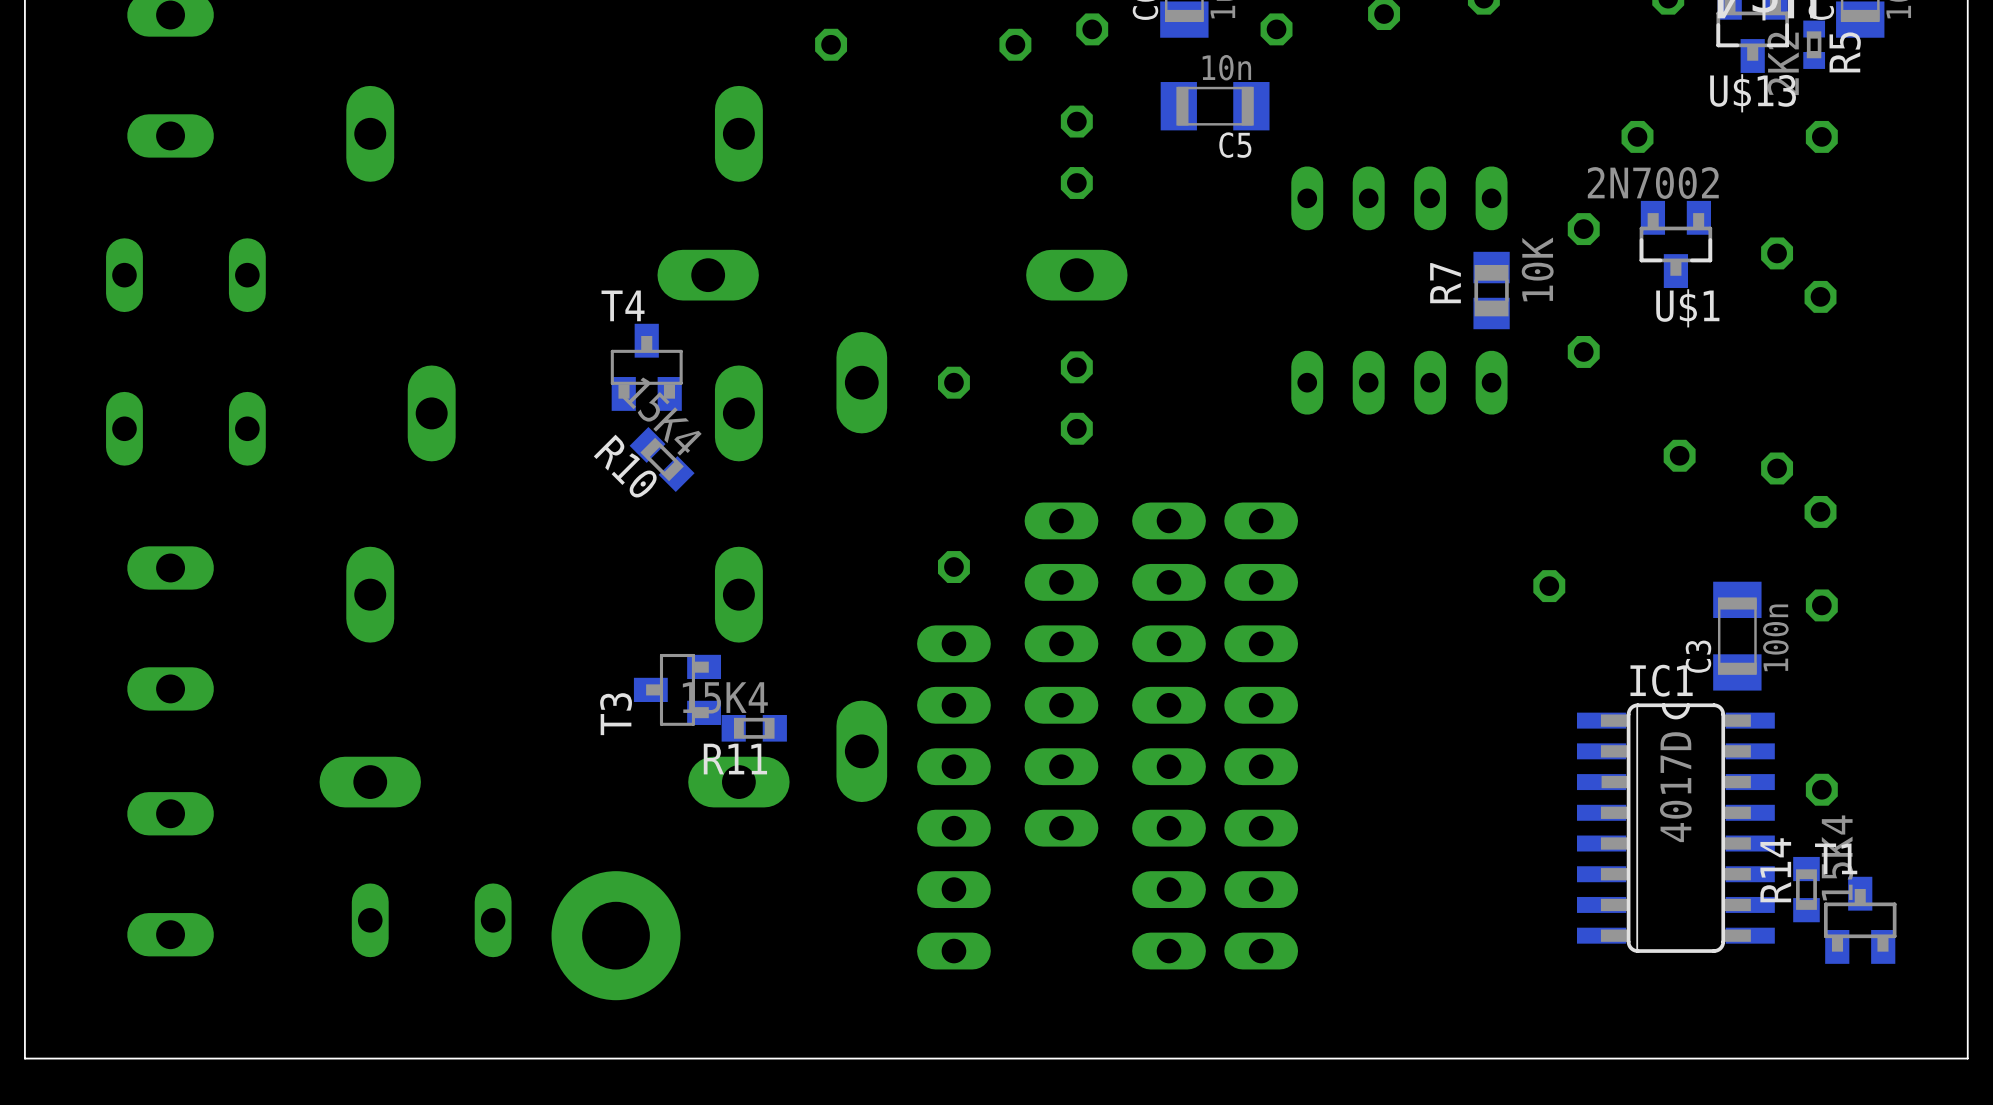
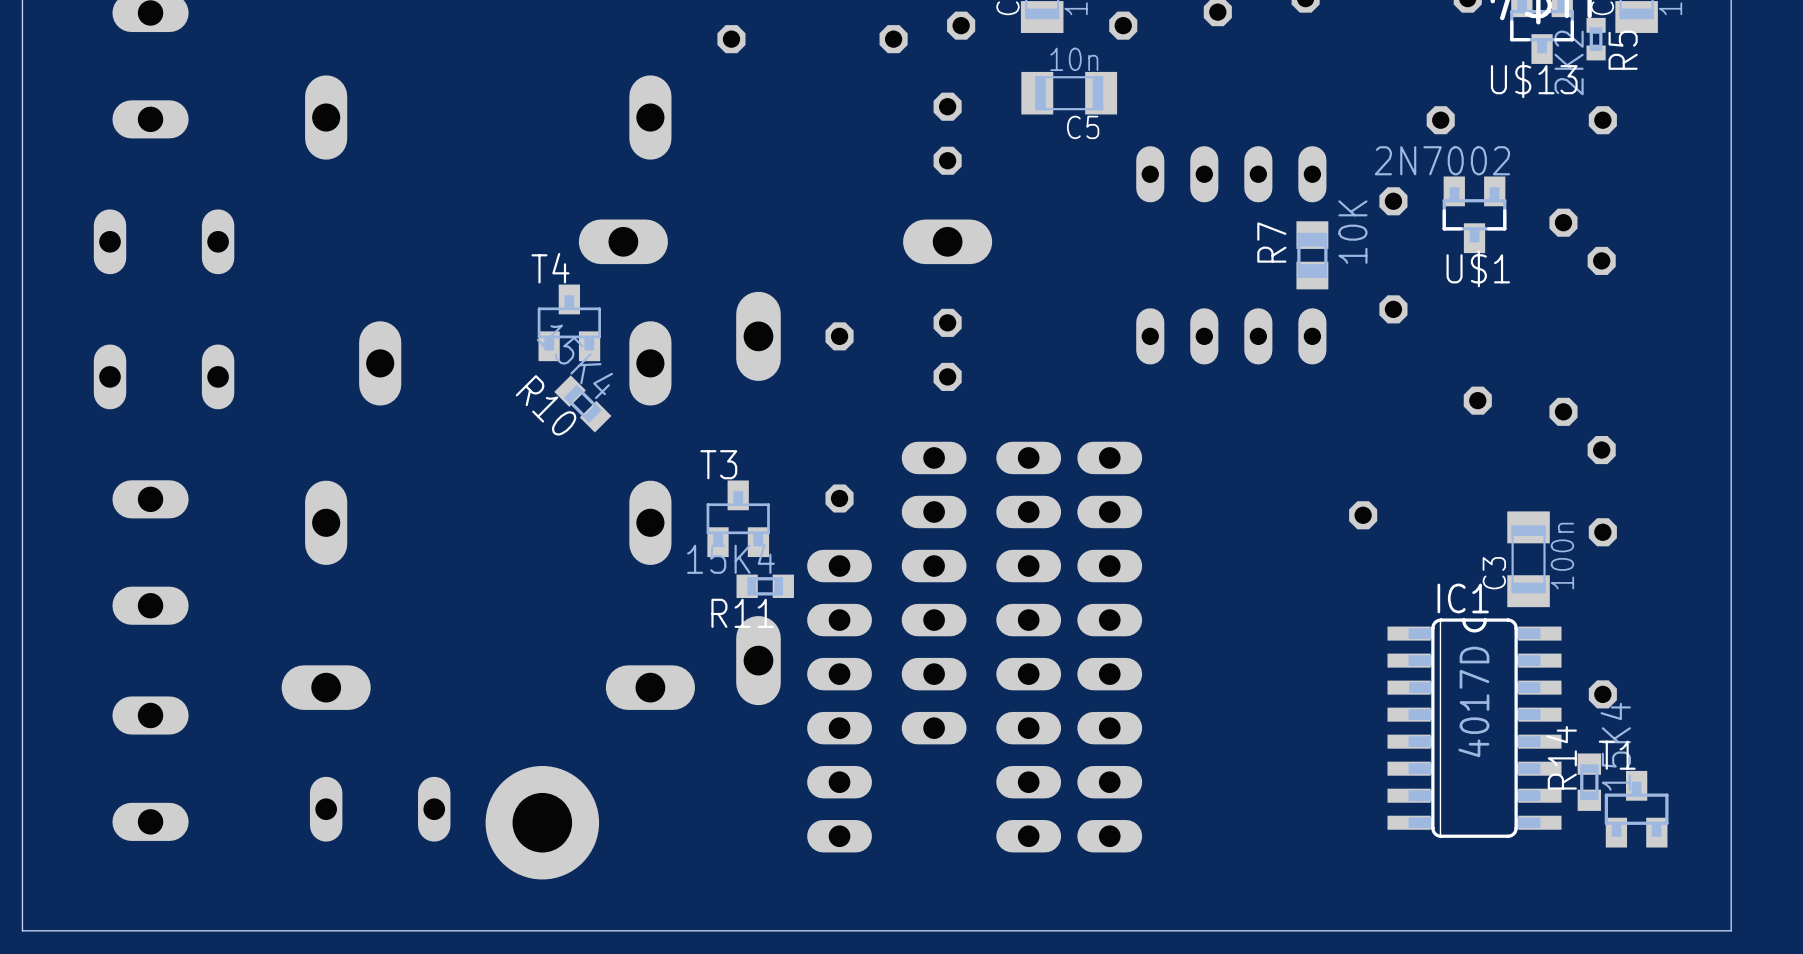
T3 rotation: 0° (677, 689) -> 90° clockwise (738, 518)
T3 position: (677, 689) -> (738, 518)
R11 position: (754, 728) -> (765, 586)

